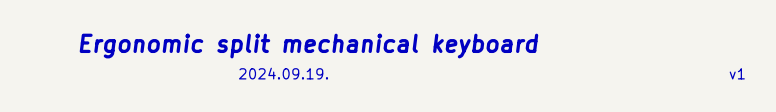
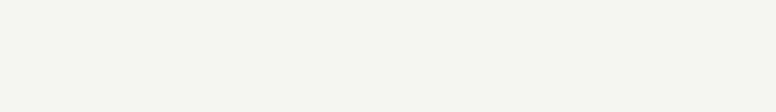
text: Ergonomic split mechanical keyboard (308, 46) -> none
text: 2024.09.19. (283, 73) -> none
text: v1 (737, 73) -> none

